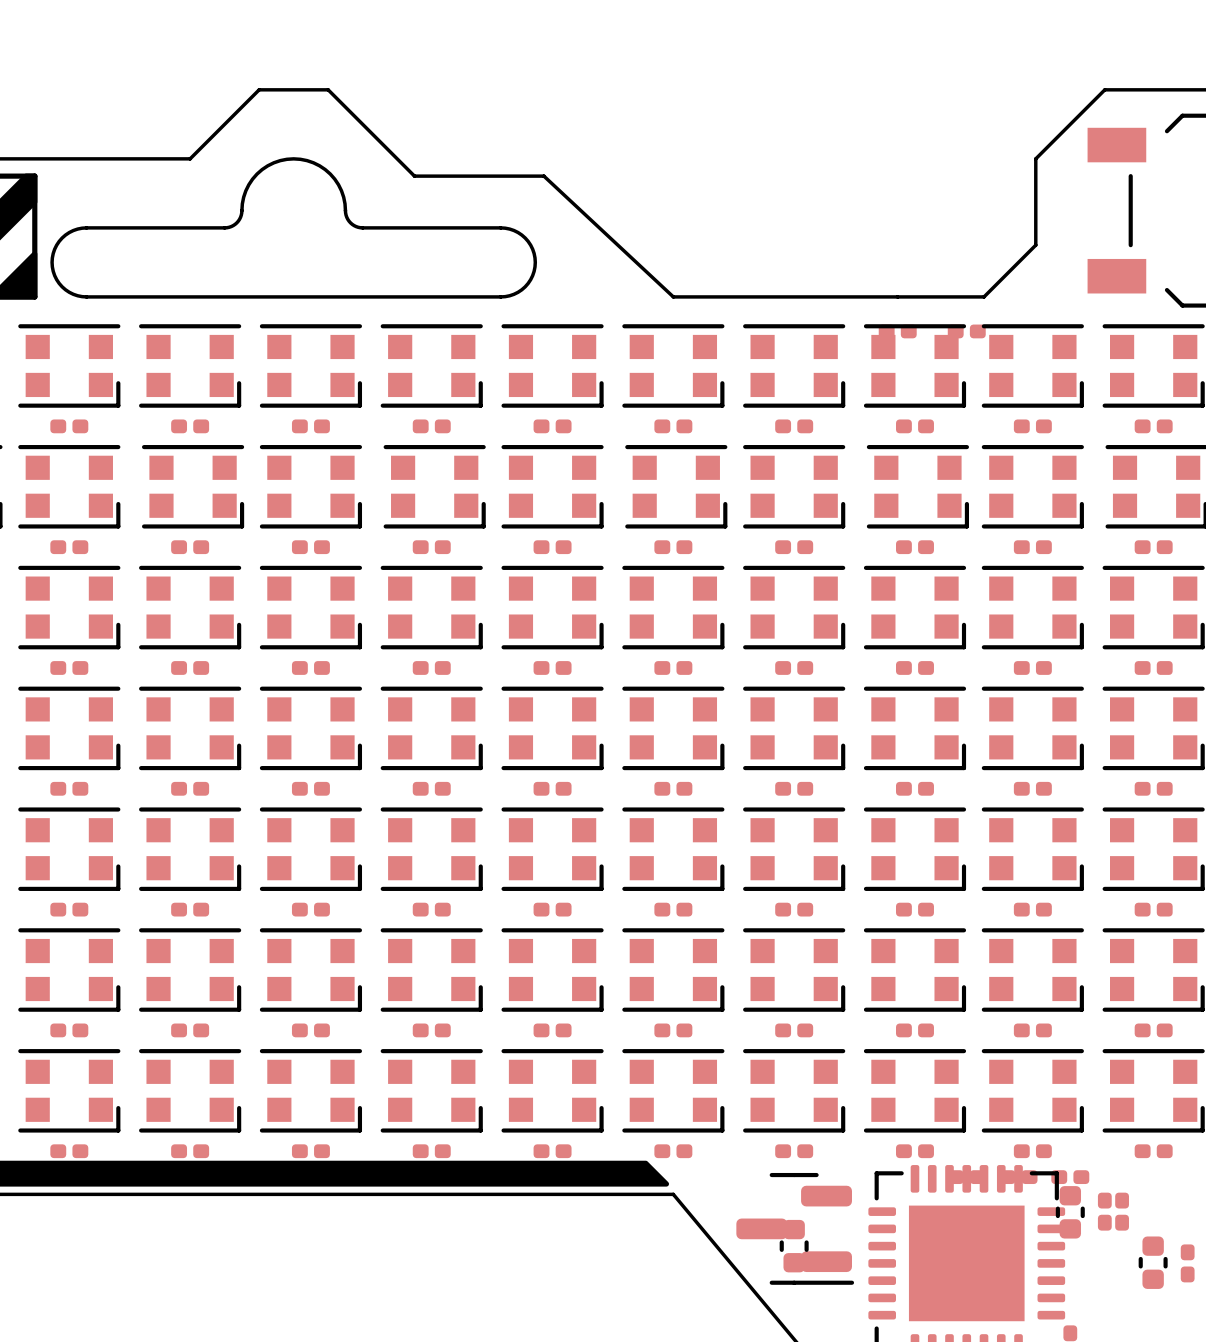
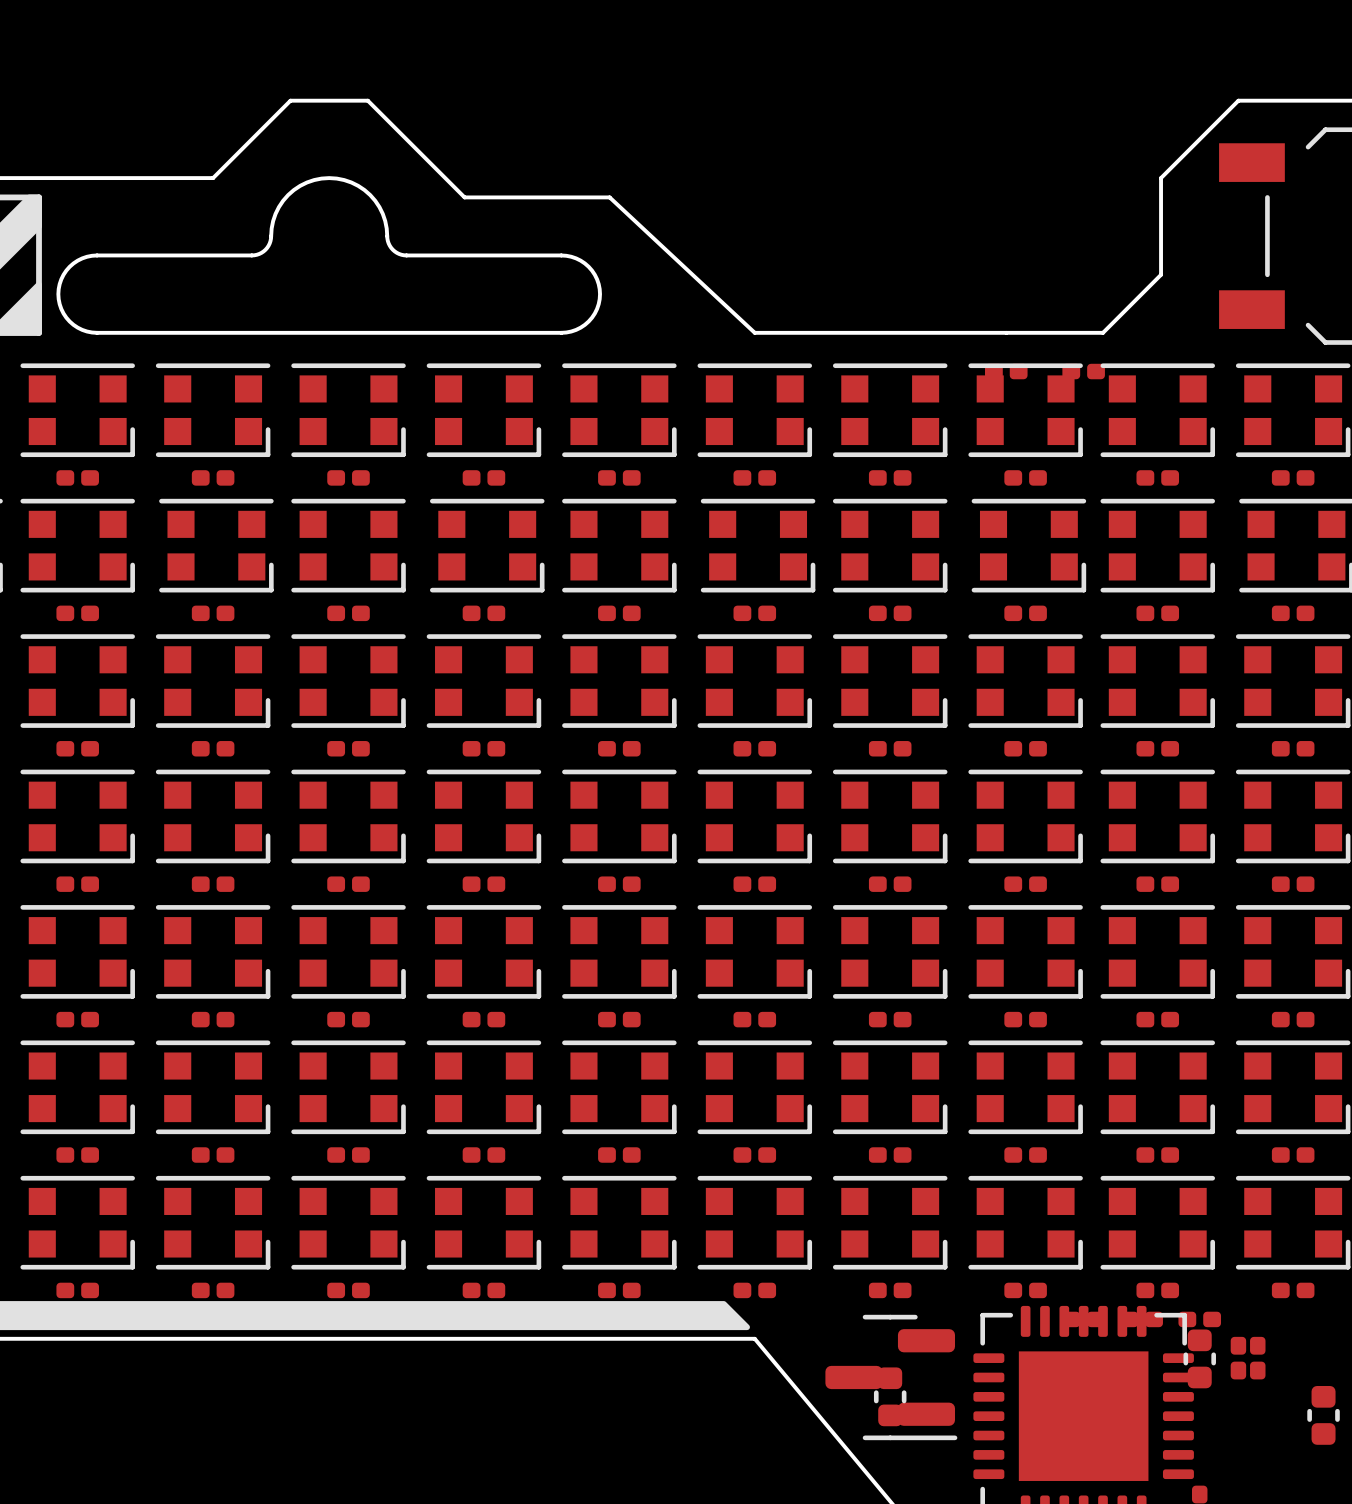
part footprint: [1180, 1244, 1195, 1283] -> [1307, 1386, 1340, 1445]
part: (1153, 1262) -> none

